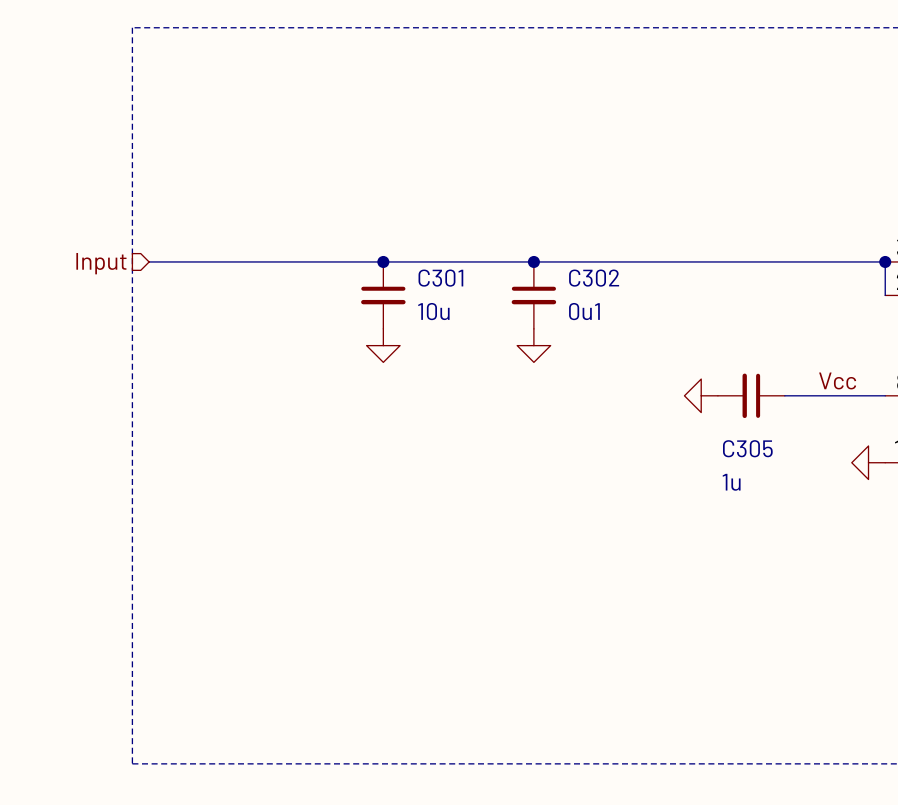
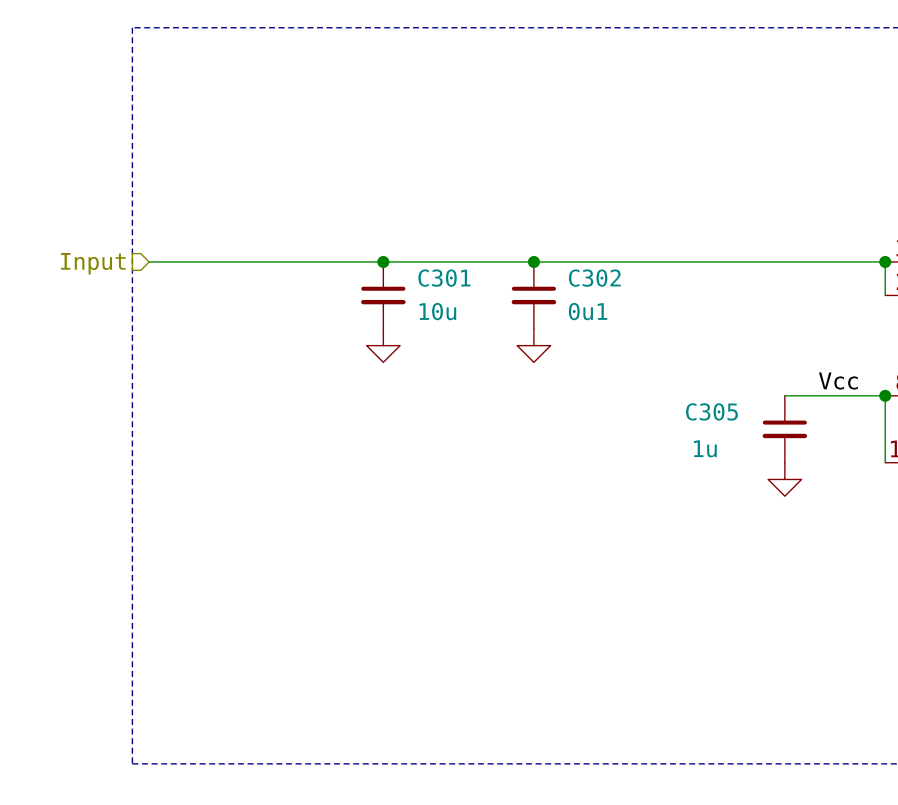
power symbol: (701, 395) -> none
C305 rotation: 0° (751, 395) -> 90° counterclockwise (784, 429)
C305 position: (751, 395) -> (784, 429)
wire: none -> (885, 395) (885, 462)
junction: none -> (885, 395)
C305 name position: C305 (747, 448) -> C305 (711, 411)
power symbol: (868, 462) -> none
power symbol: none -> (784, 479)
C305 value position: 1u (731, 482) -> 1u (705, 448)

